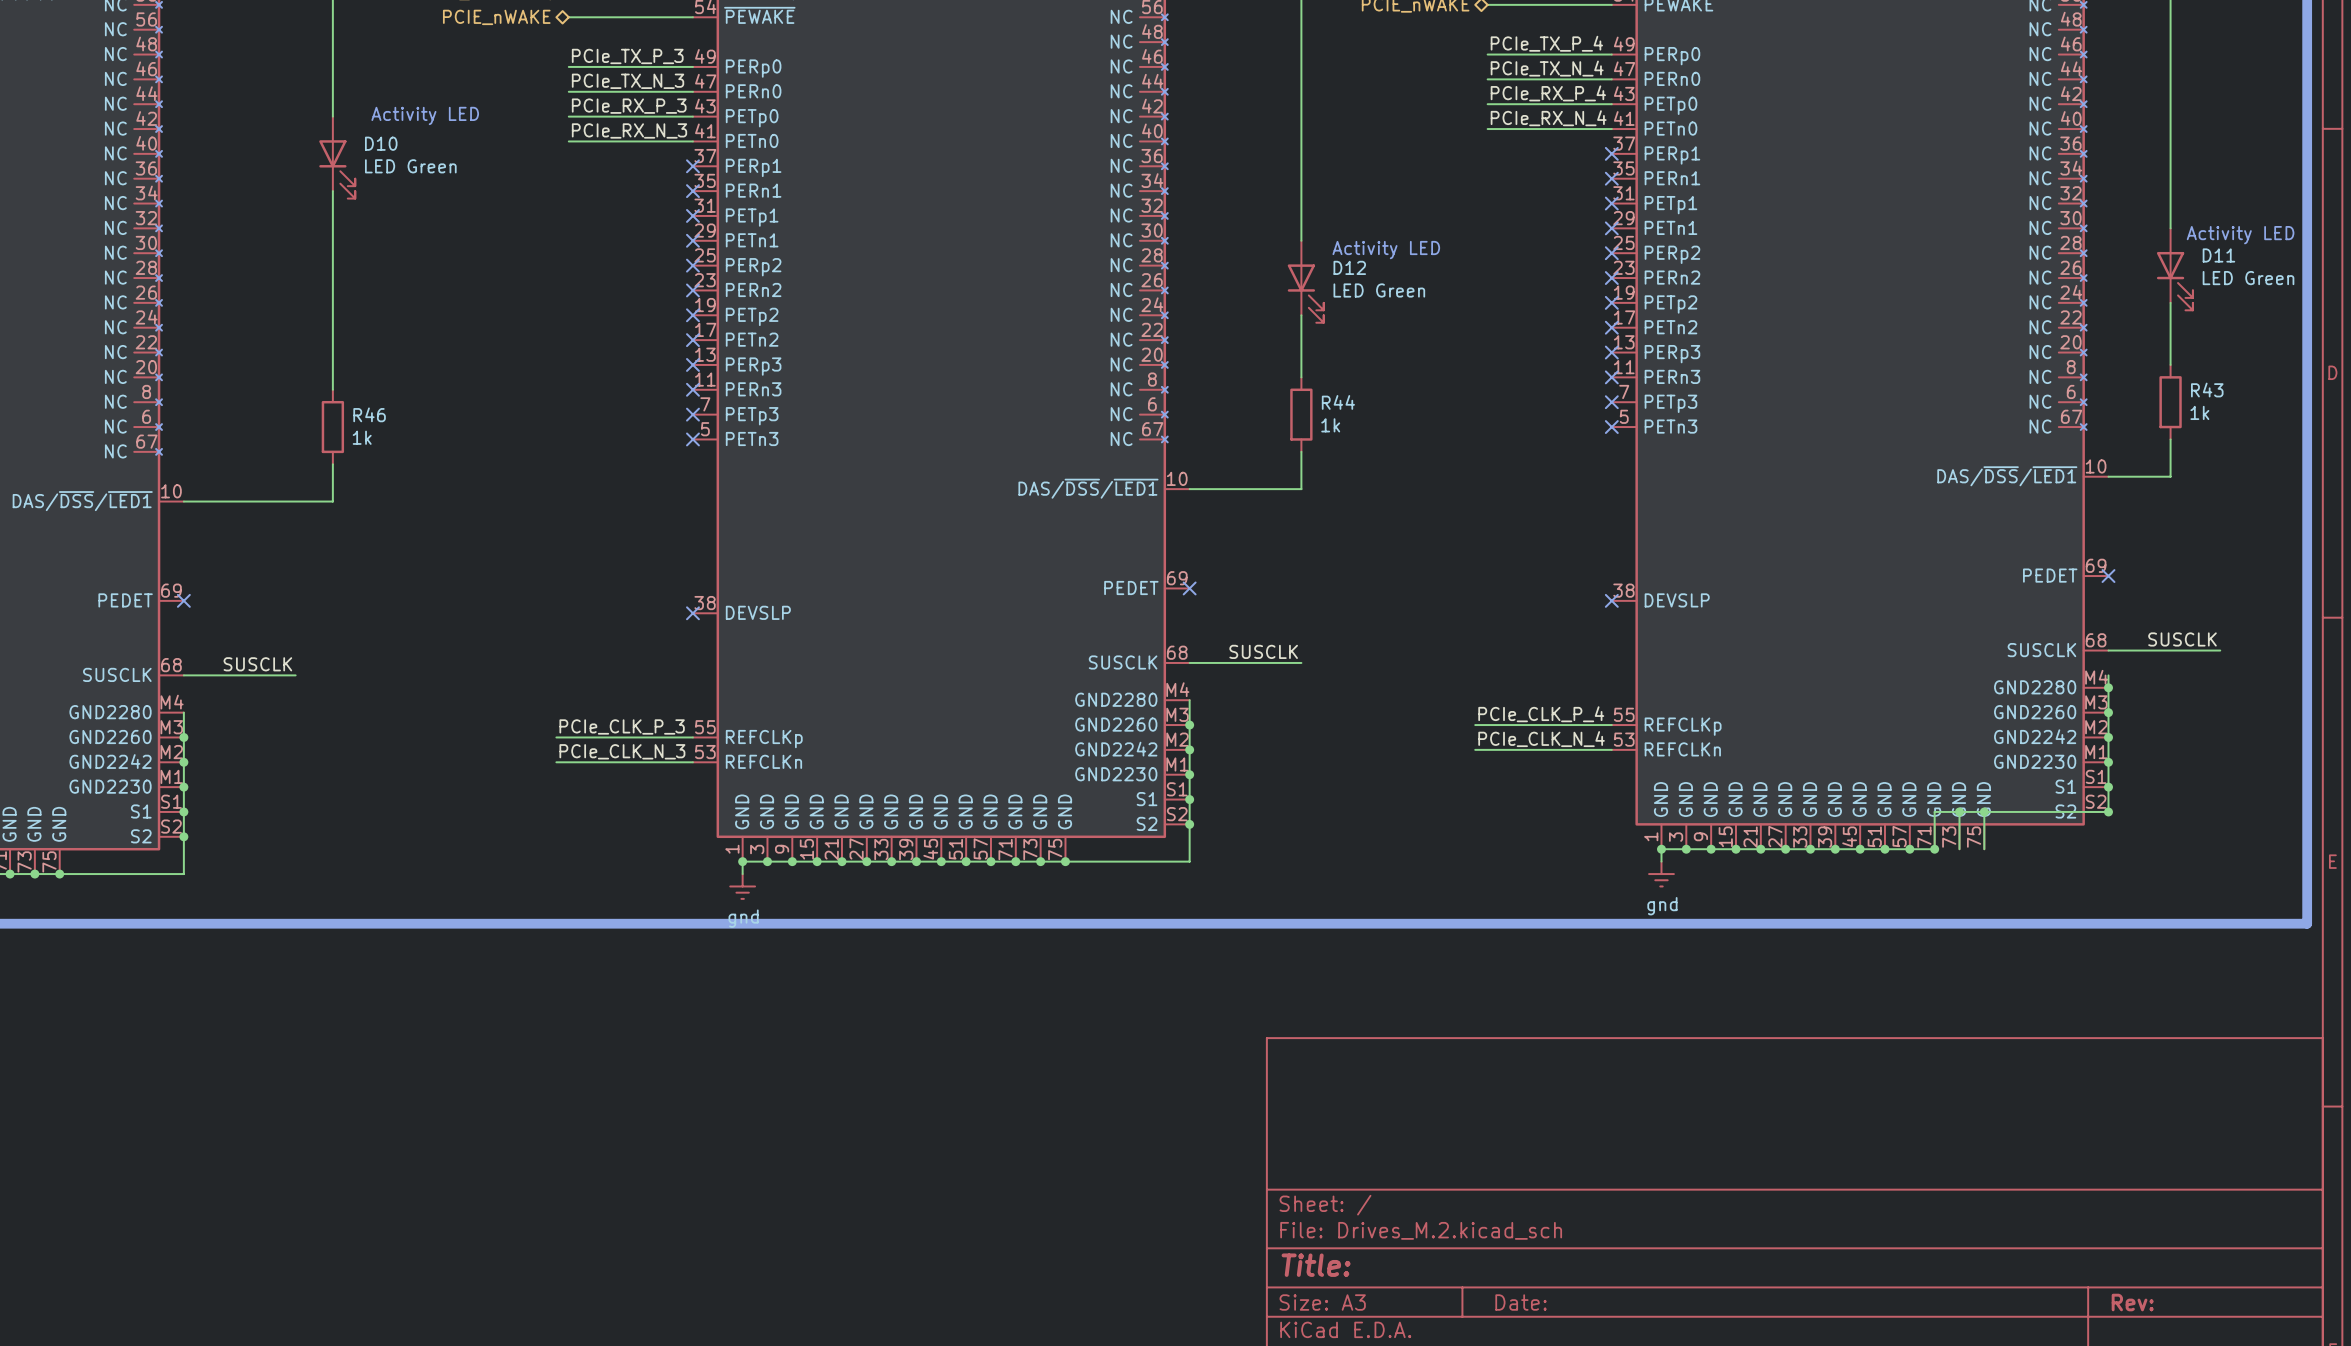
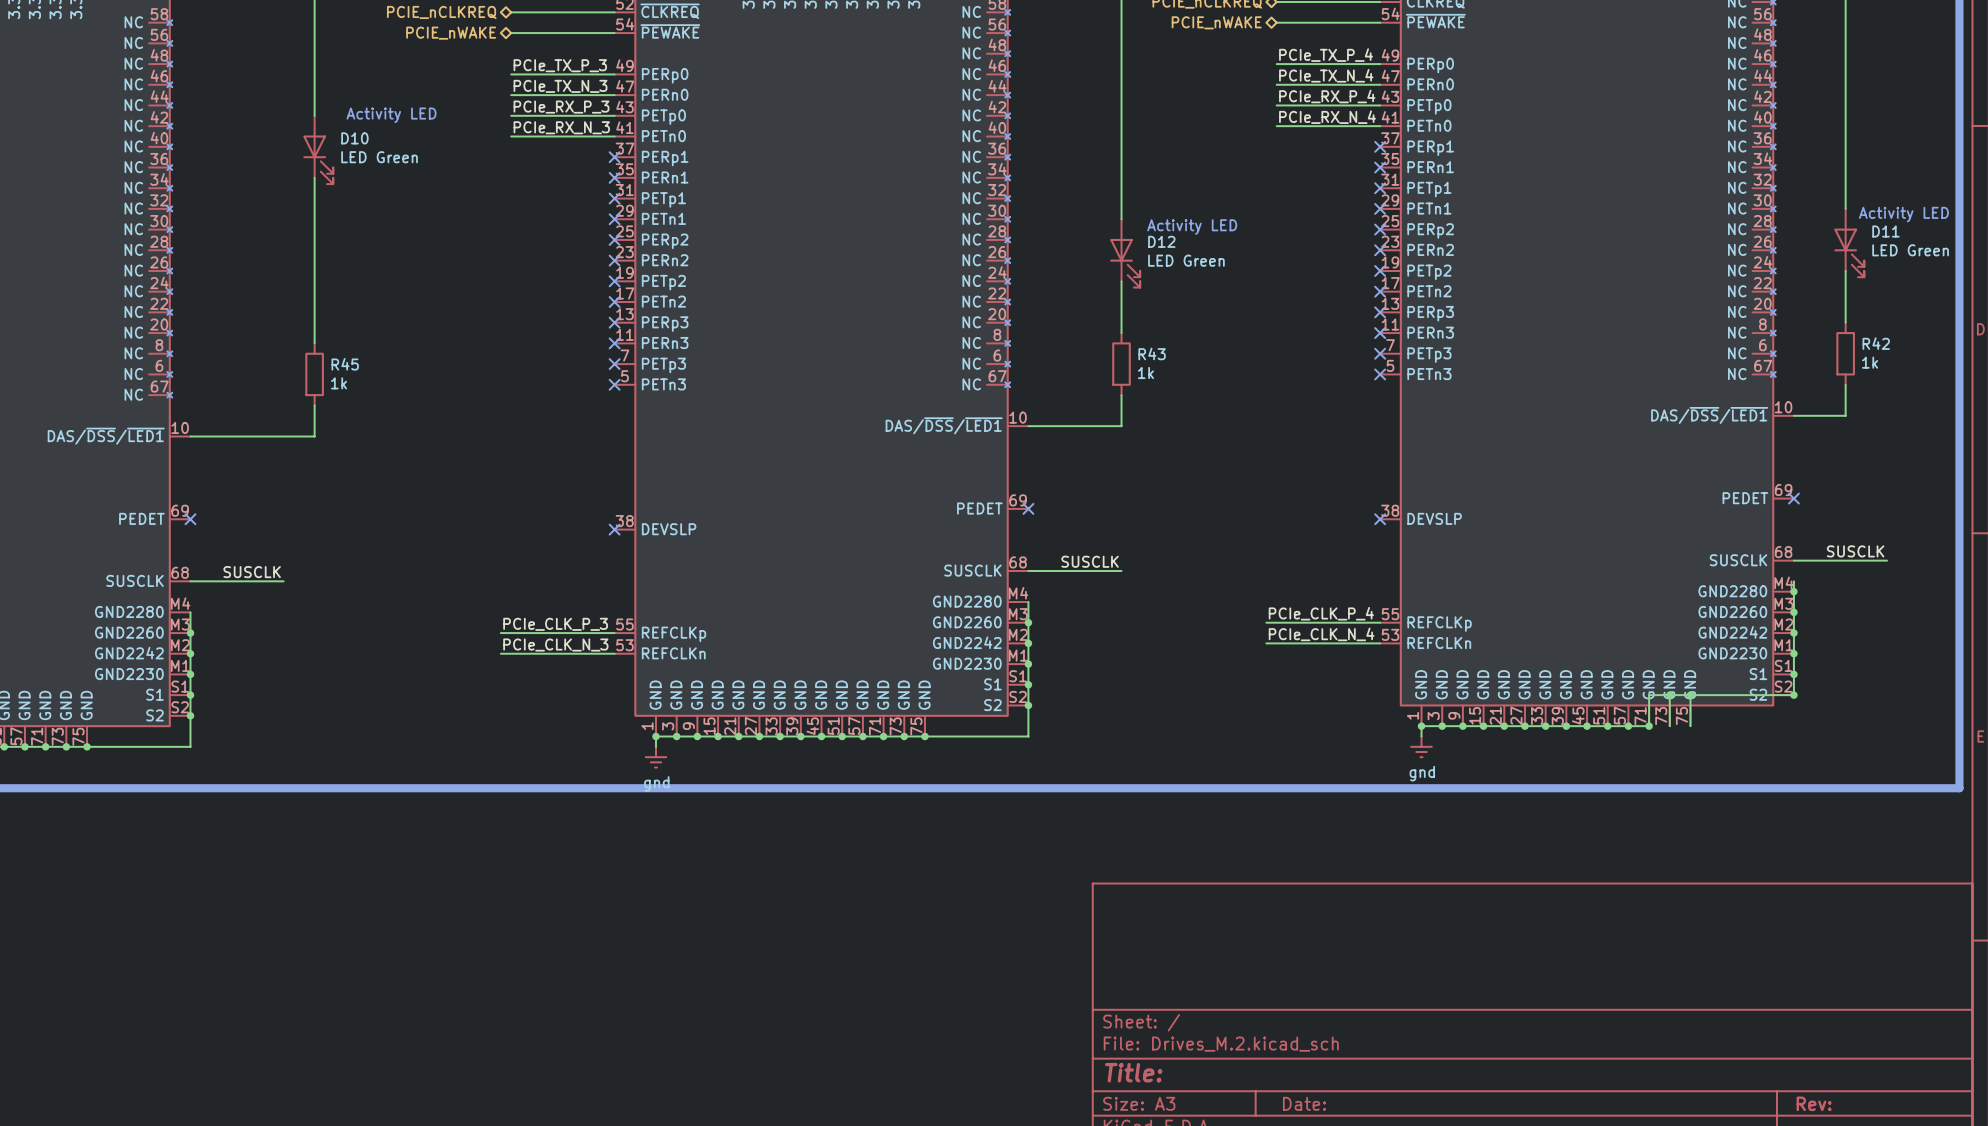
R43 name: R43 (2207, 390) -> R42 (1876, 343)
R44 name: R44 (1338, 402) -> R43 (1152, 353)
R46 name: R46 (369, 414) -> R45 (345, 364)

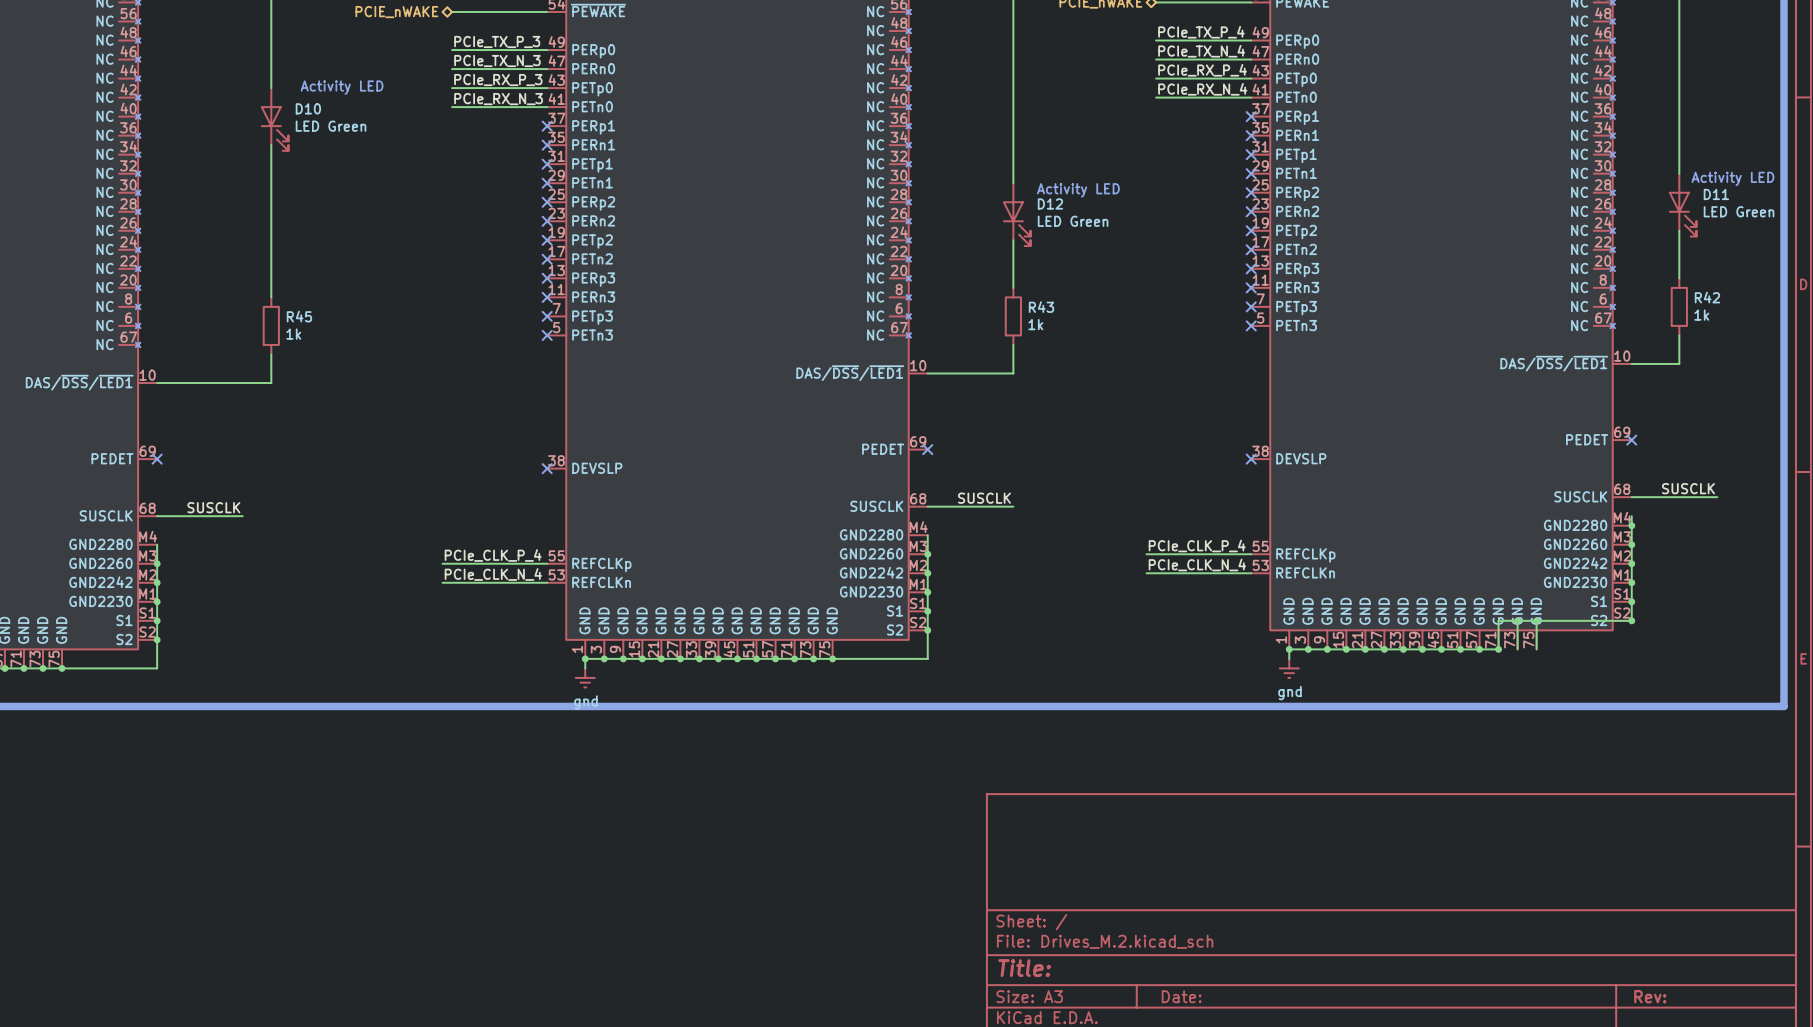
label: PCIe_CLK_P_3 (555, 624) -> PCIe_CLK_P_4 (493, 555)
label: PCIe_CLK_N_3 (555, 645) -> PCIe_CLK_N_4 (493, 574)

